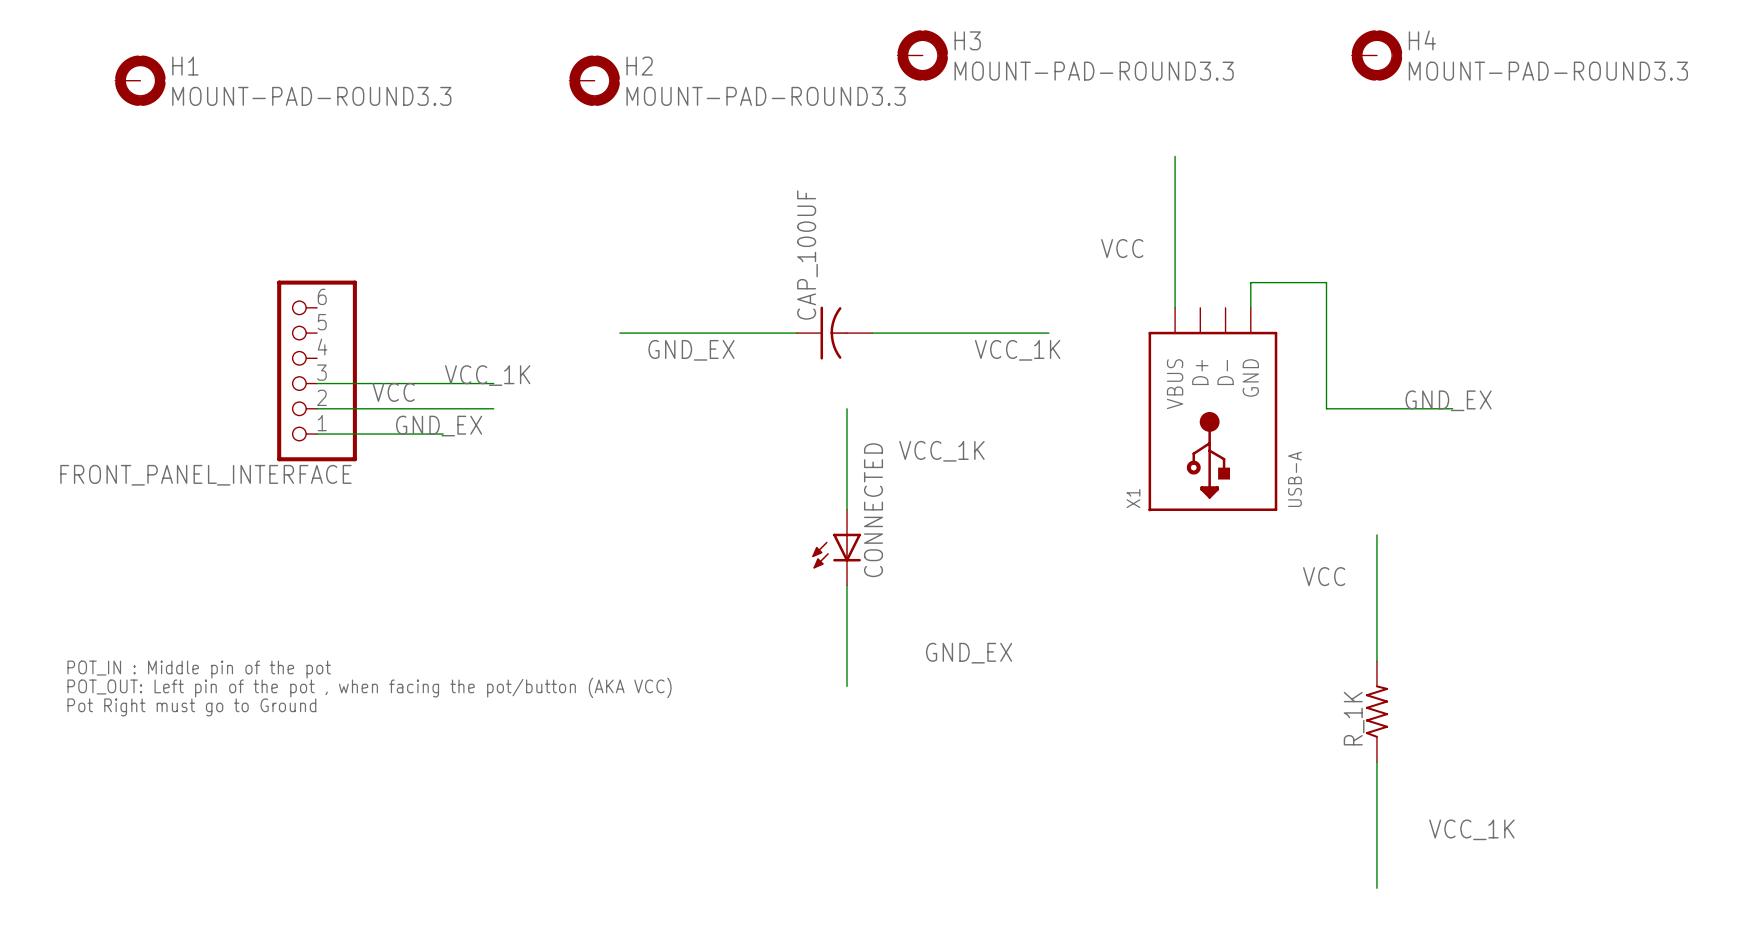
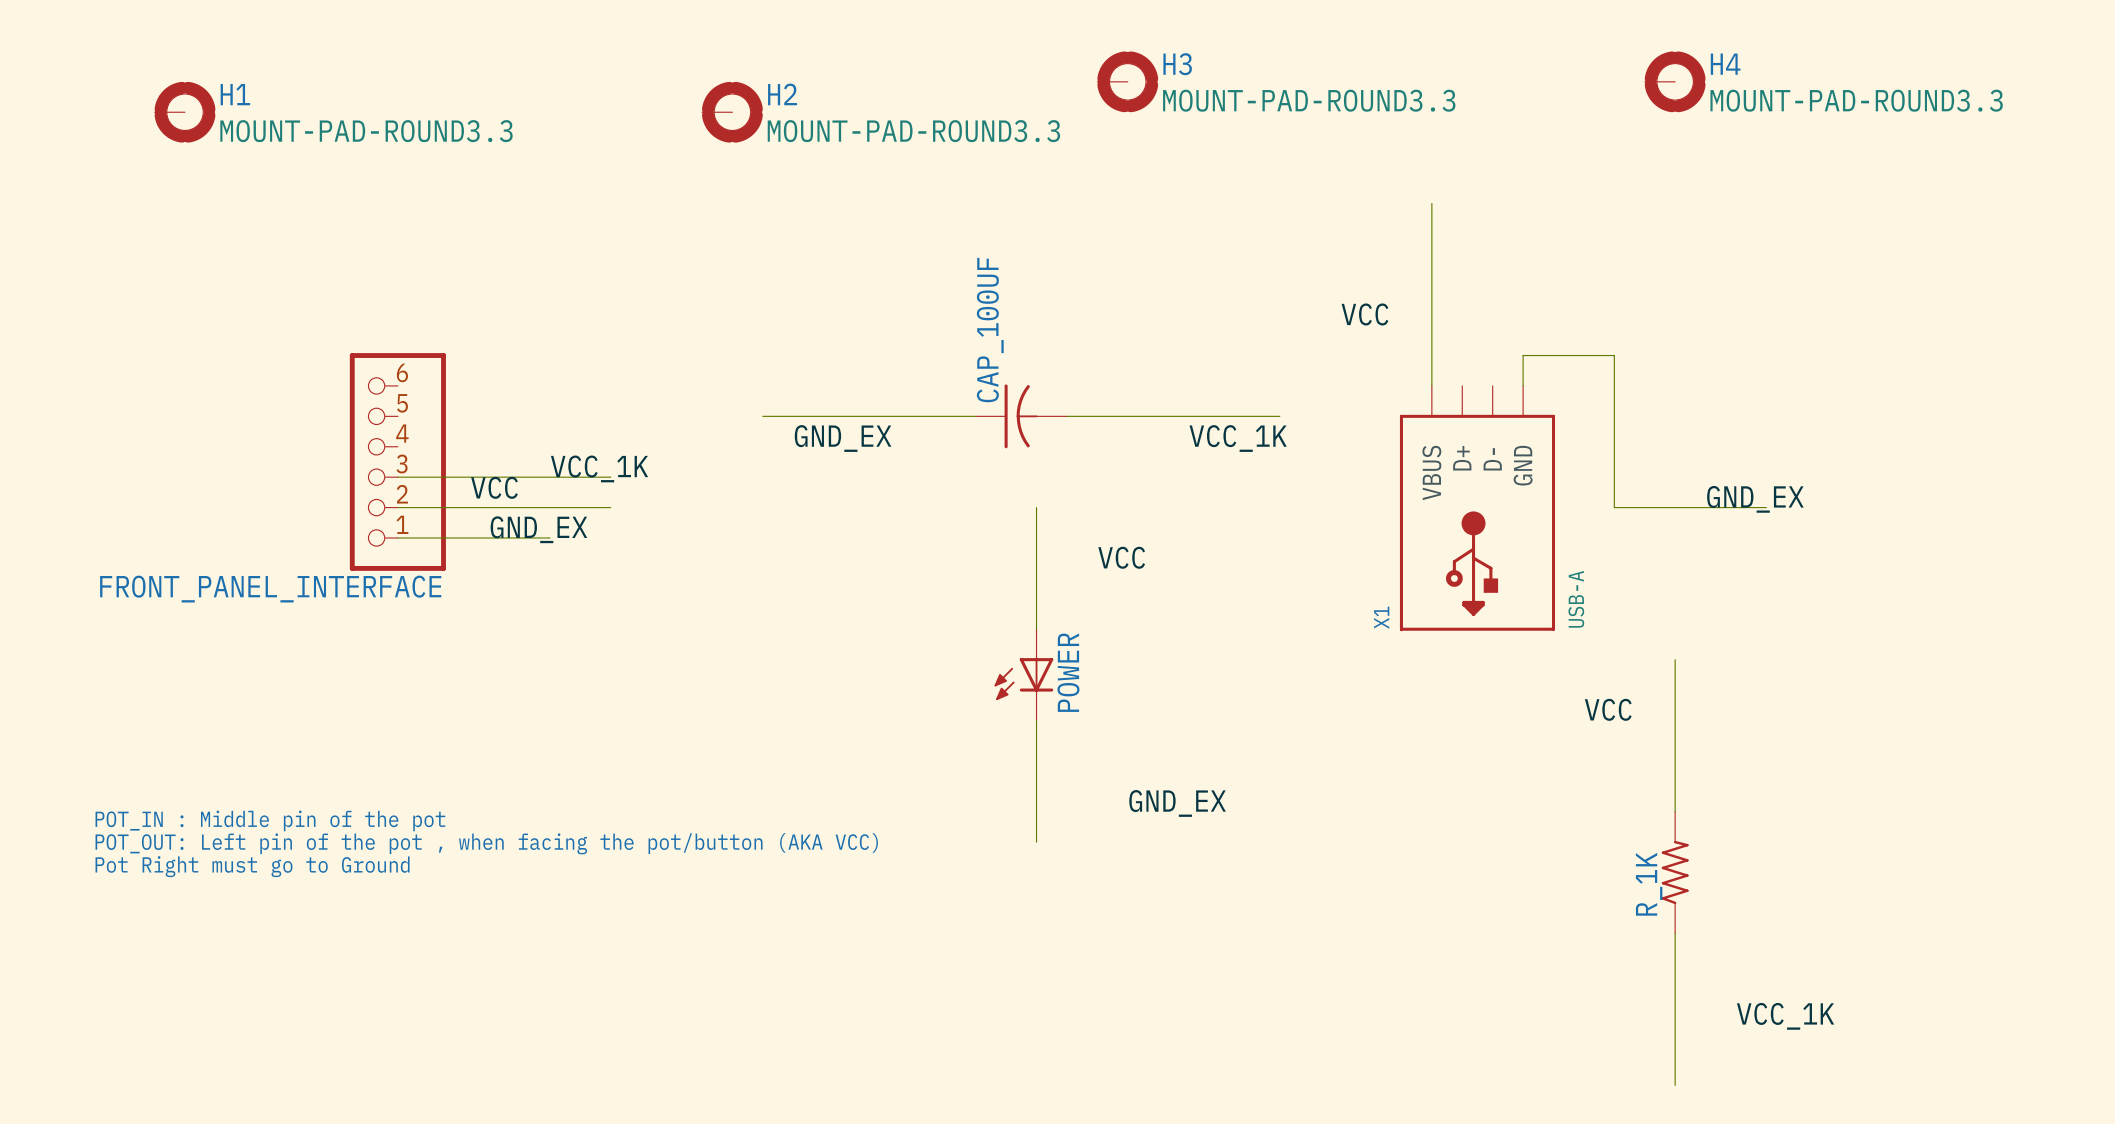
label: VCC_1K (941, 451) -> VCC (1121, 557)
CONNECTED name: CONNECTED (873, 510) -> POWER (1068, 672)

